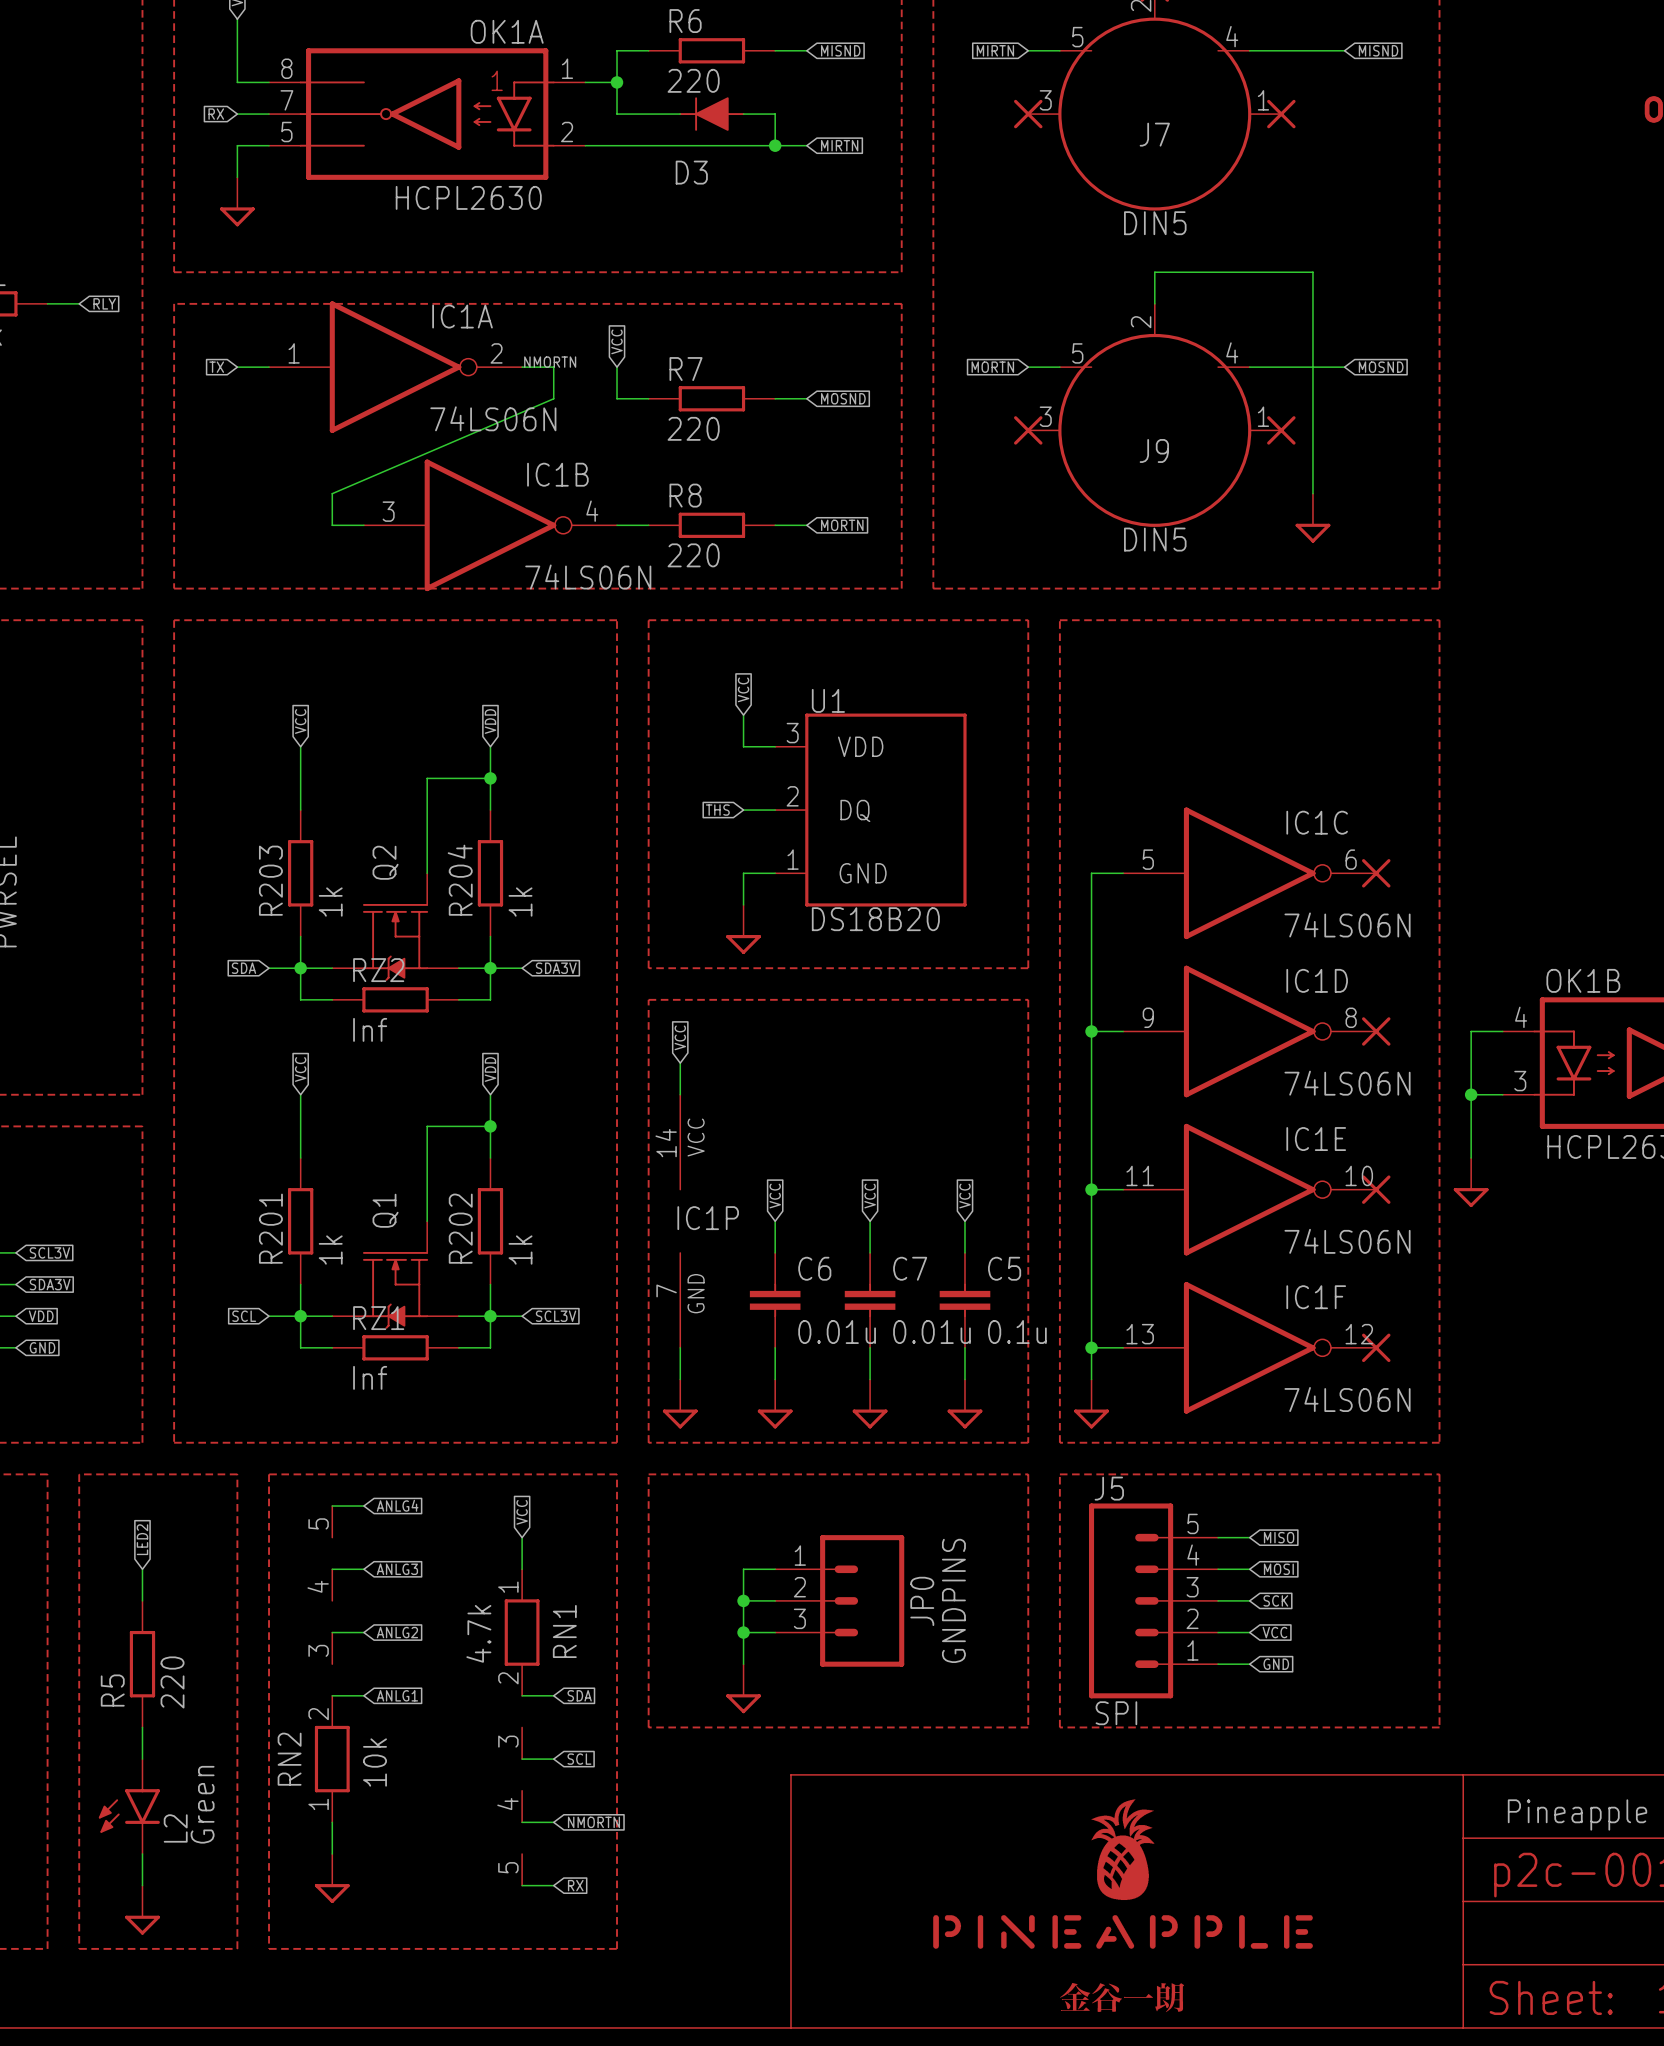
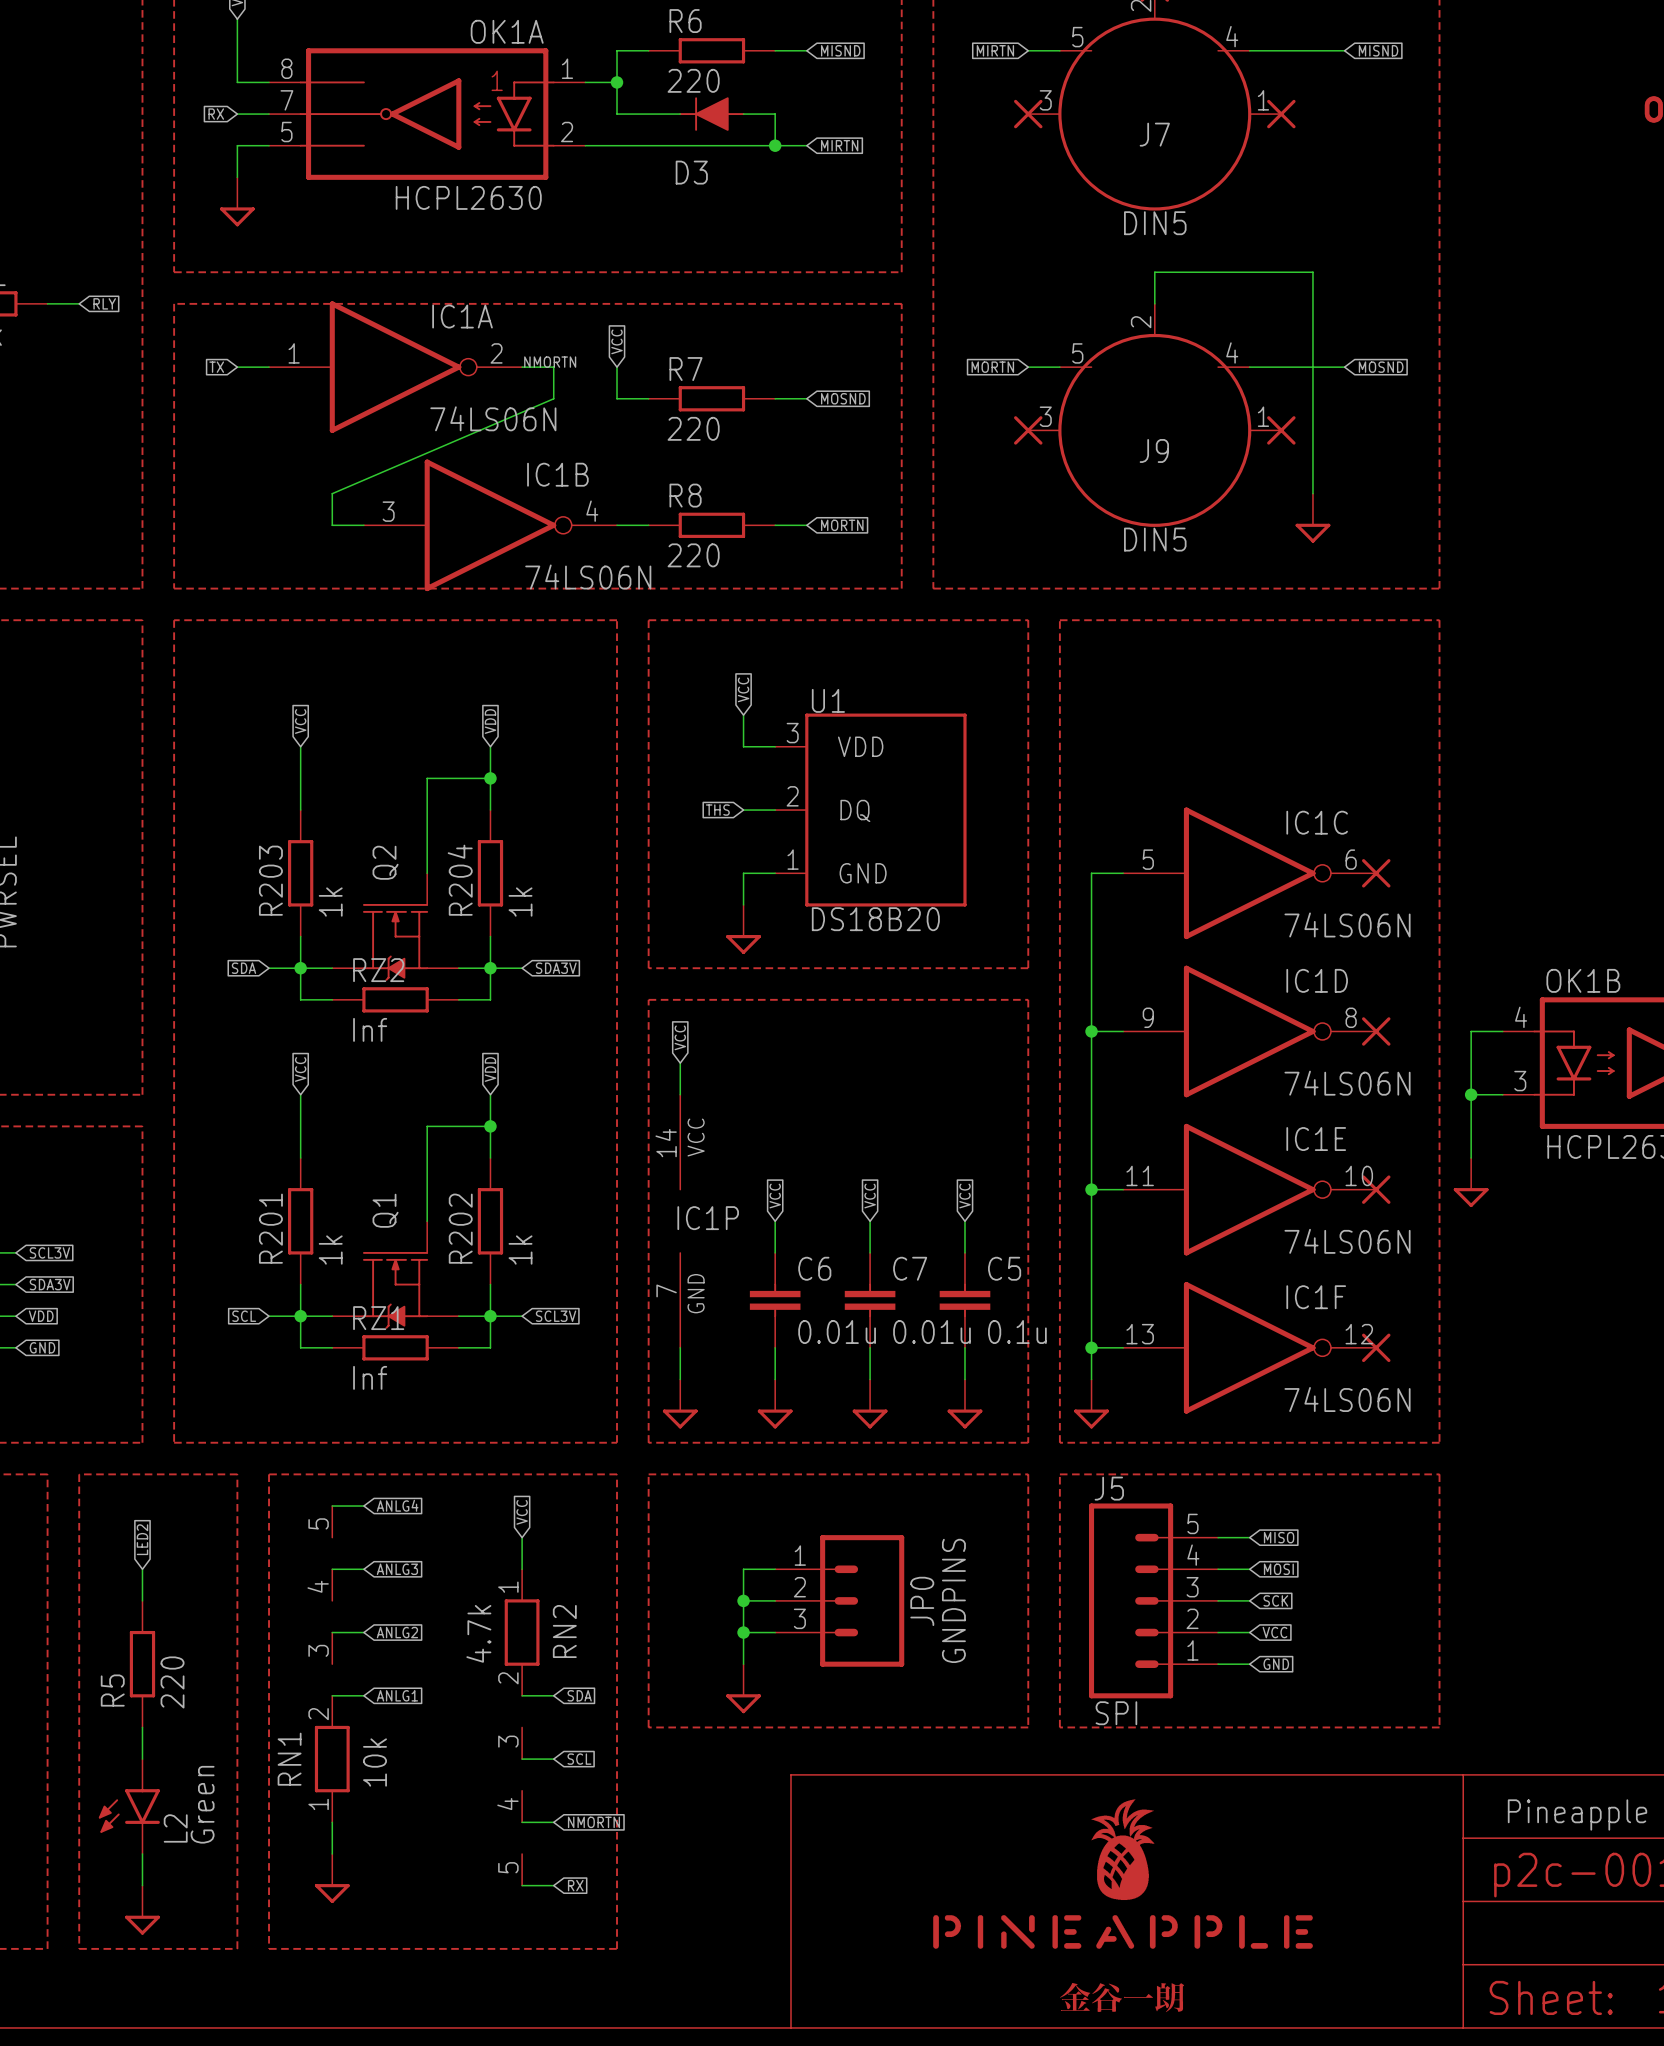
RN1 name: RN1 (564, 1631) -> RN2 (564, 1631)
RN2 name: RN2 (289, 1759) -> RN1 (289, 1759)

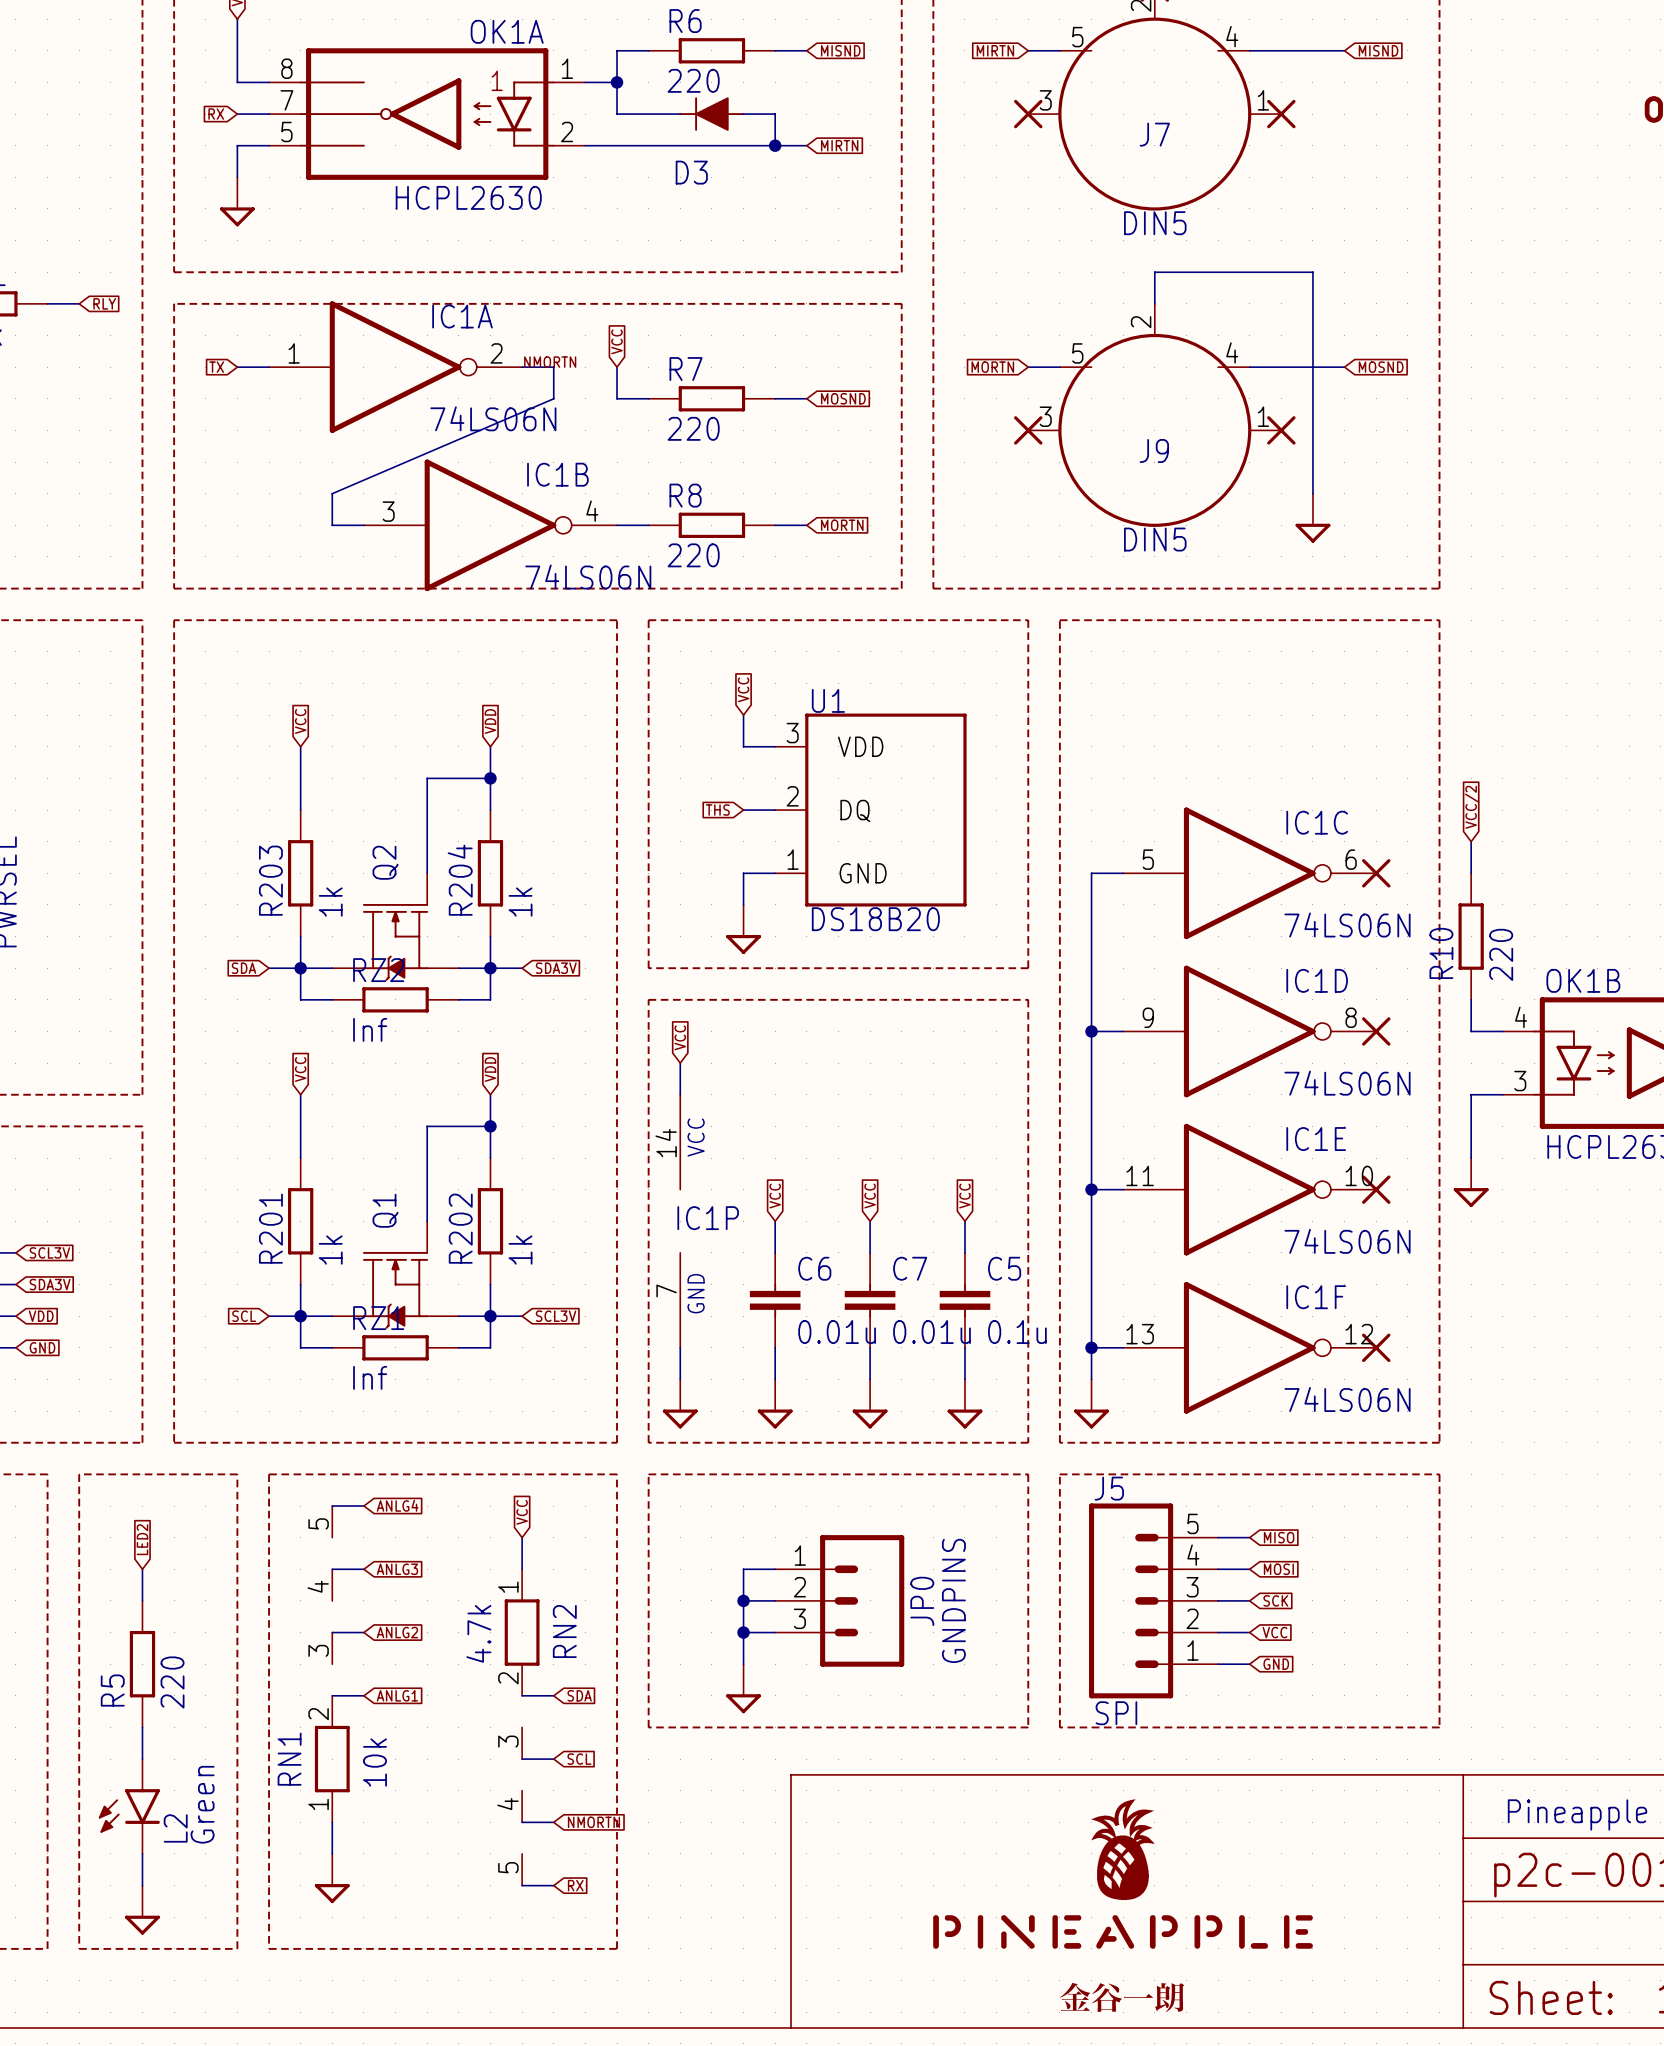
global label: none -> VCC/2 (1472, 807)
wire: none -> (1471, 841) (1471, 873)
R10: none -> 220 (1471, 936)
wire: (1471, 1031) (1471, 1094) -> (1471, 1031) (1471, 999)
junction: (1471, 1094) -> none

